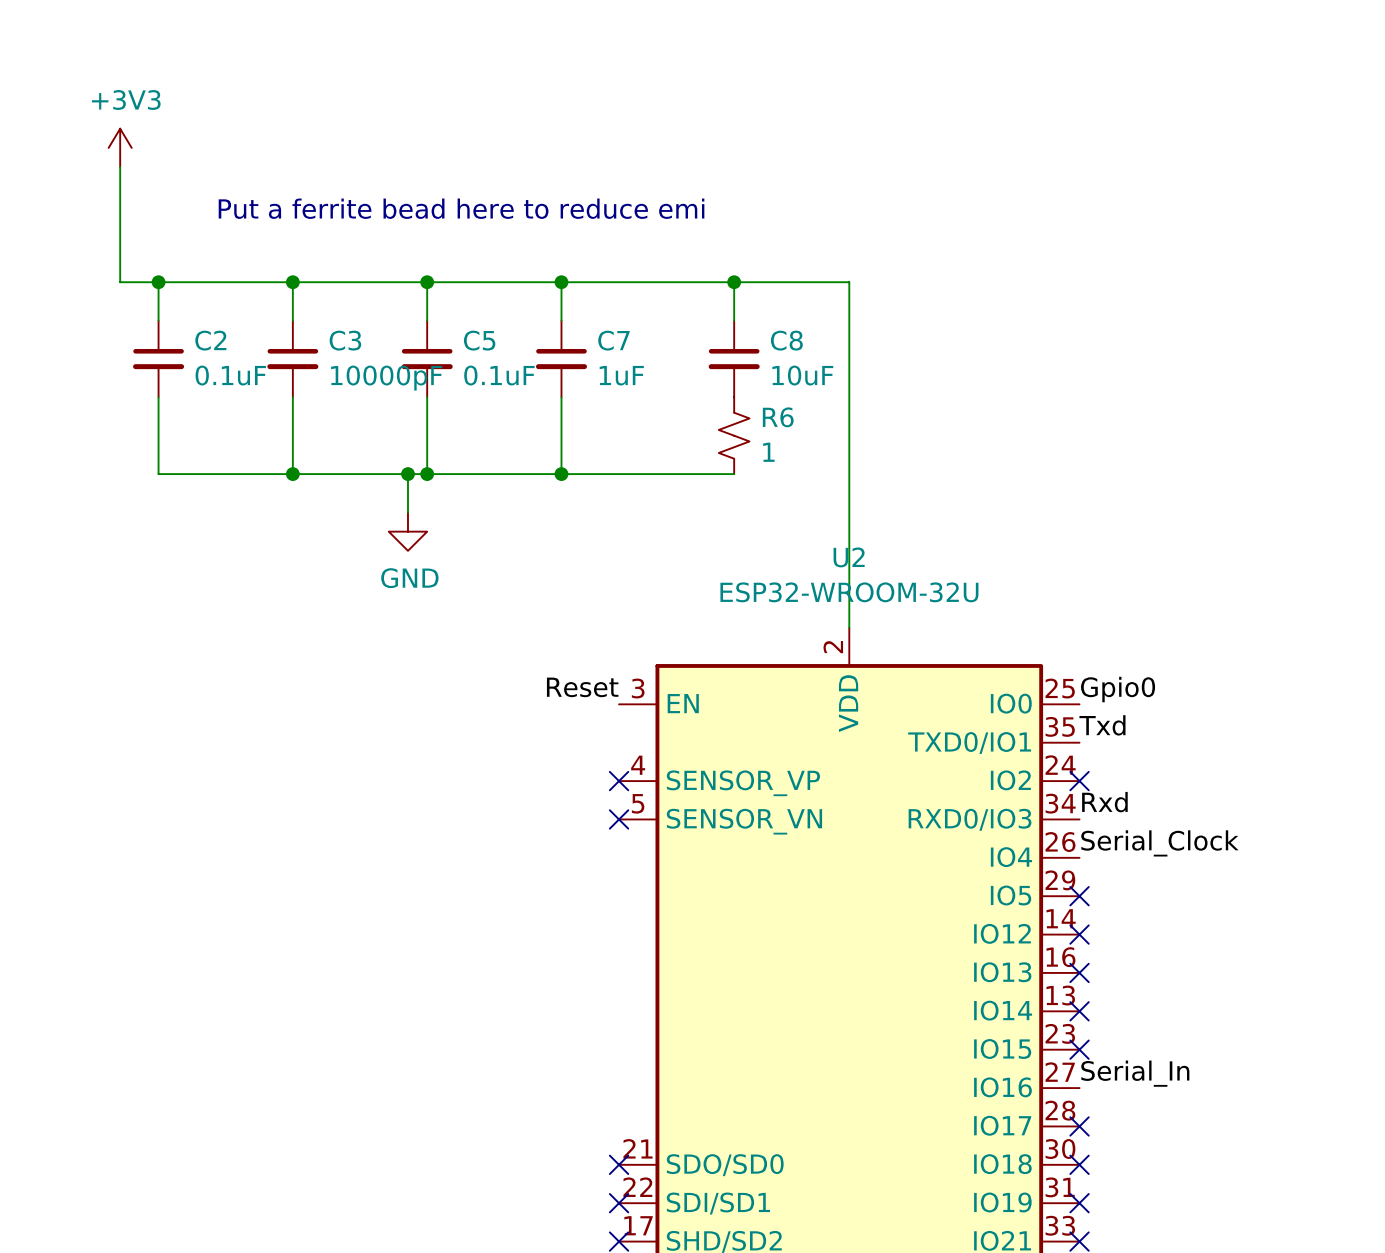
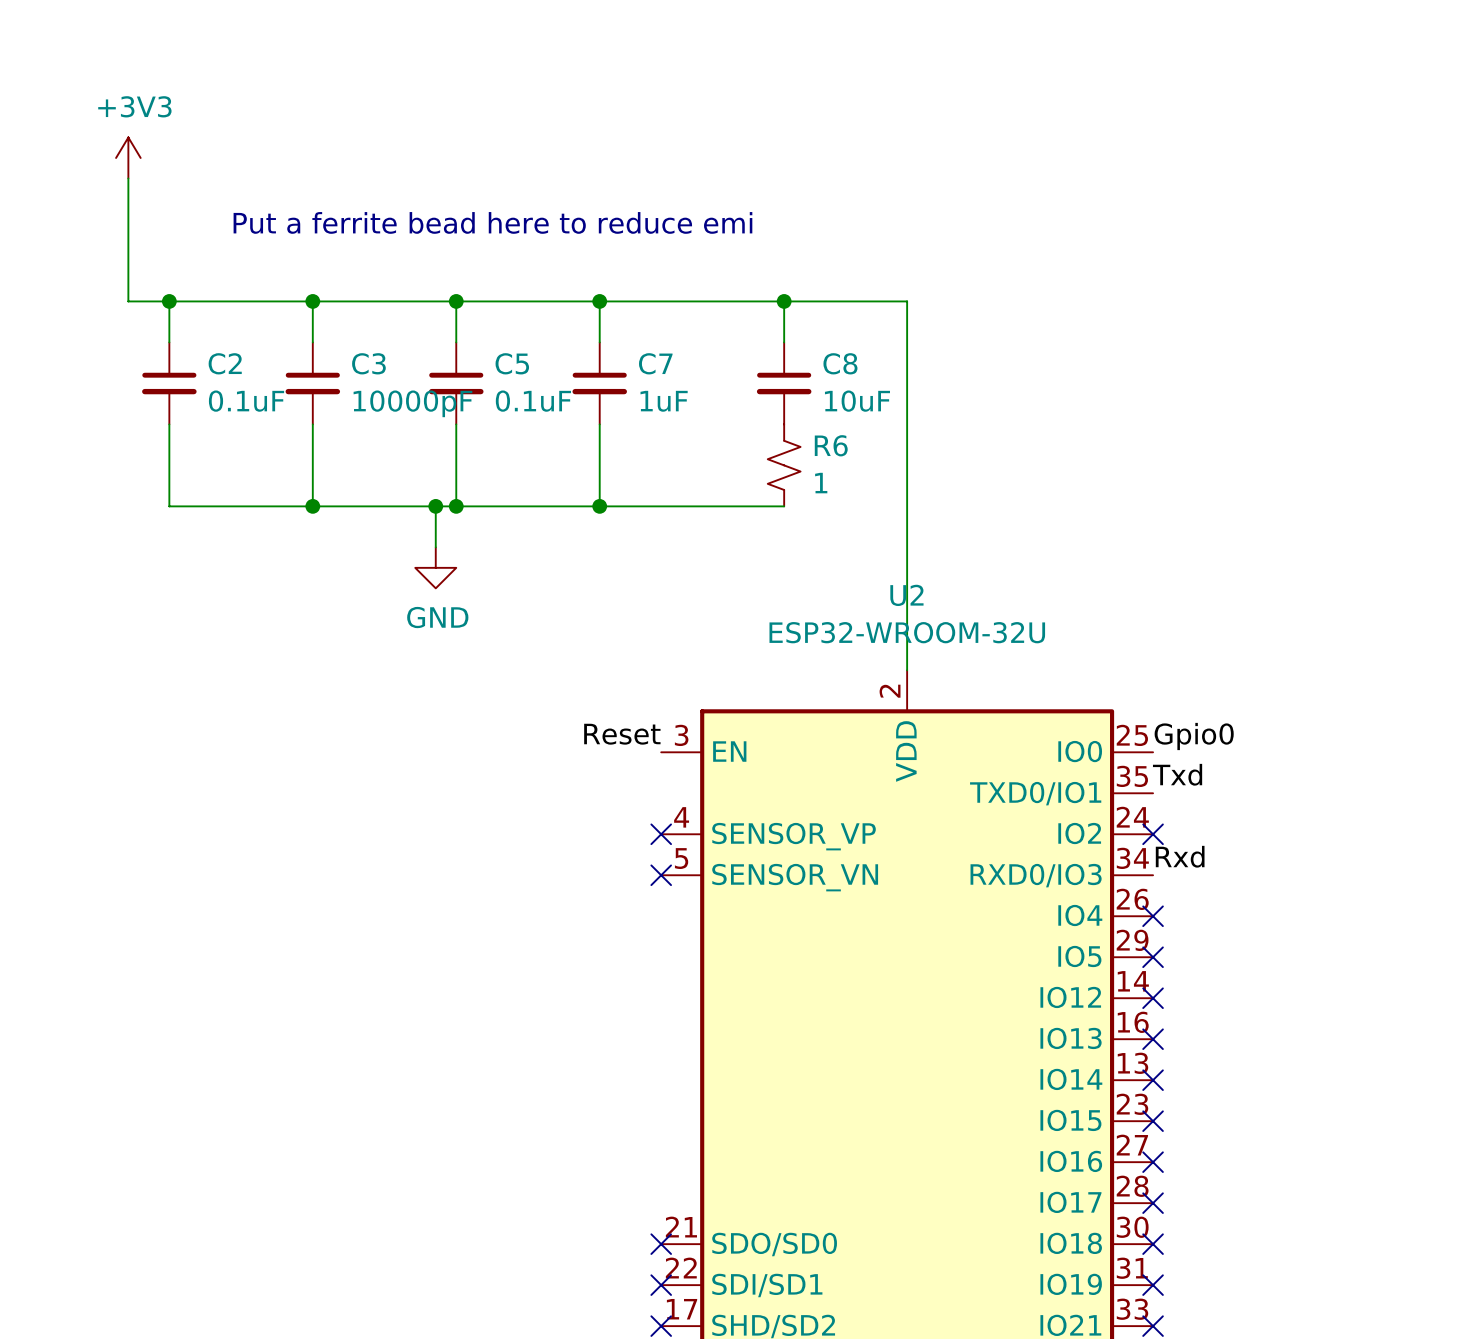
label: Serial_Clock (1159, 843) -> none
no-connect mark: none -> (1153, 916)
label: Serial_In (1135, 1073) -> none
no-connect mark: none -> (1153, 1162)

